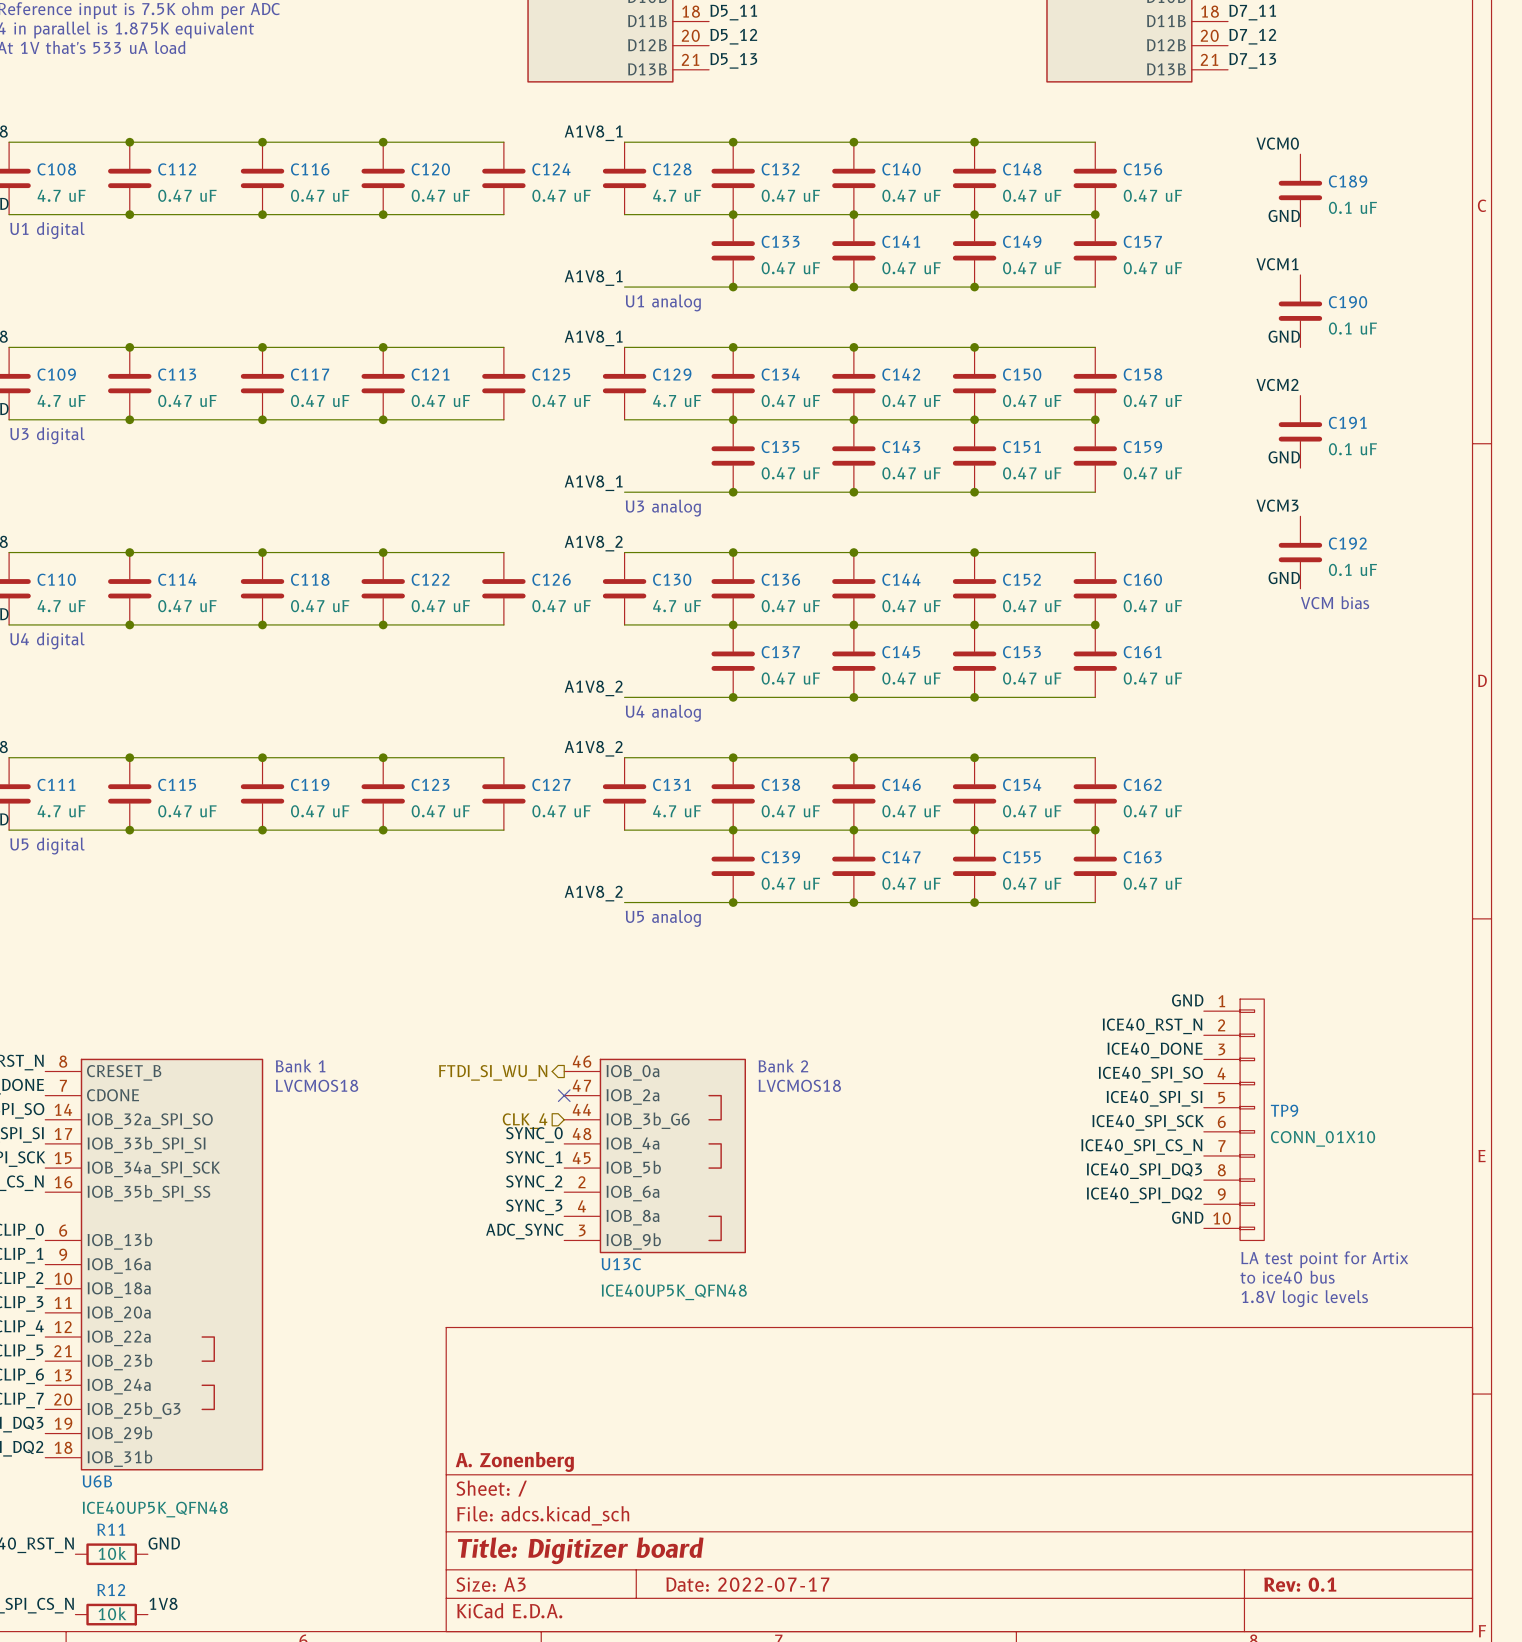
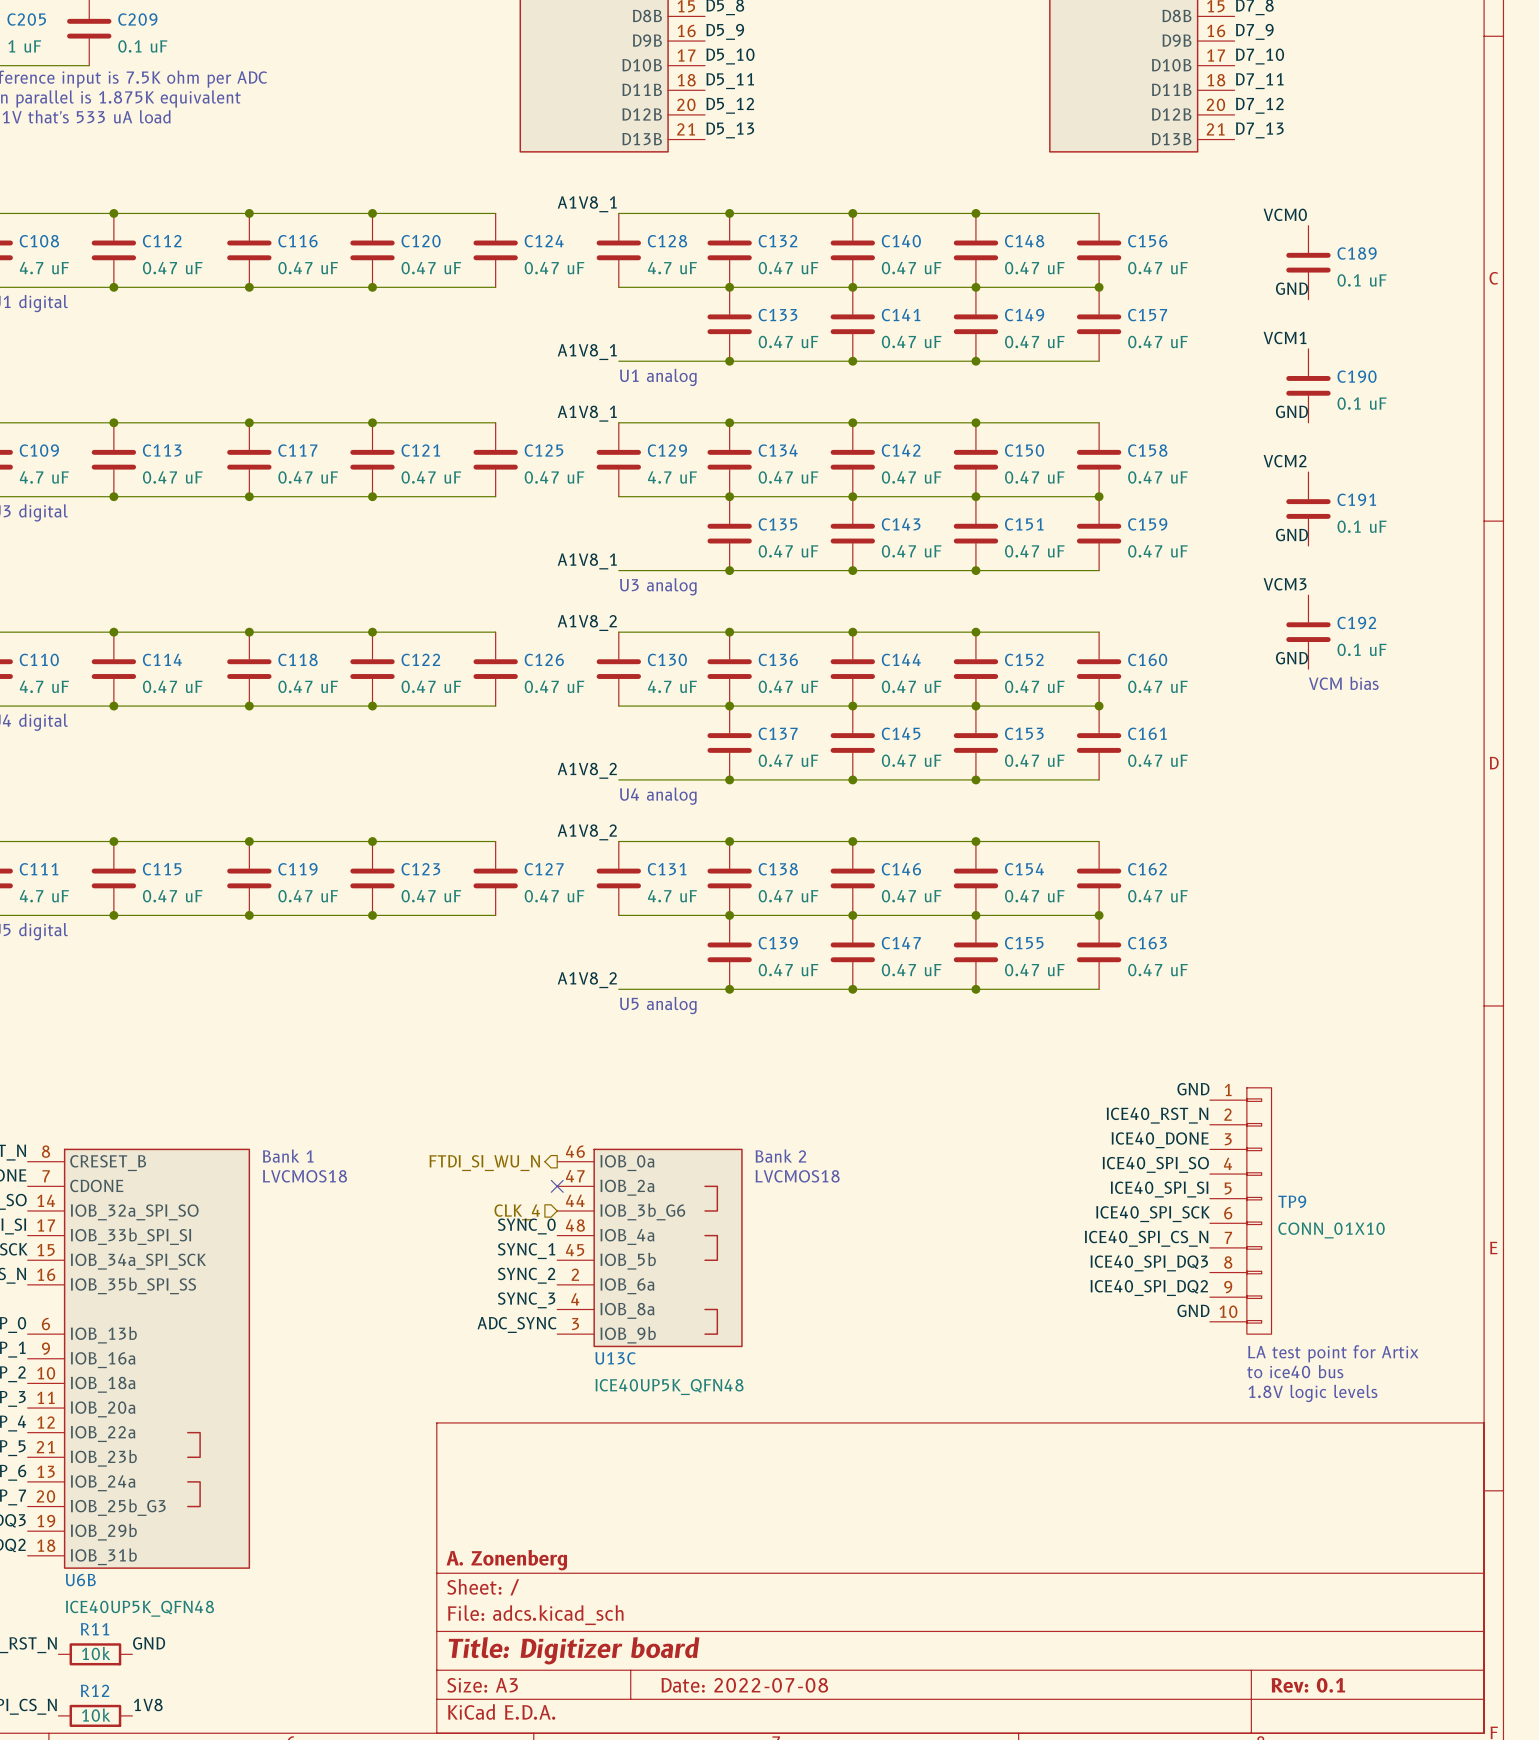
title block: Date: 2022-07-17 (747, 1584) -> Date: 2022-07-08 (744, 1685)

